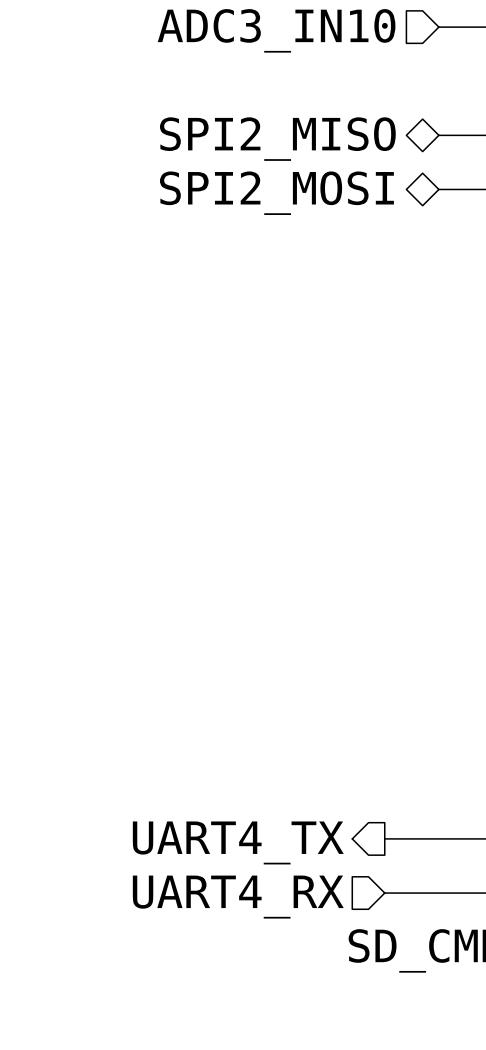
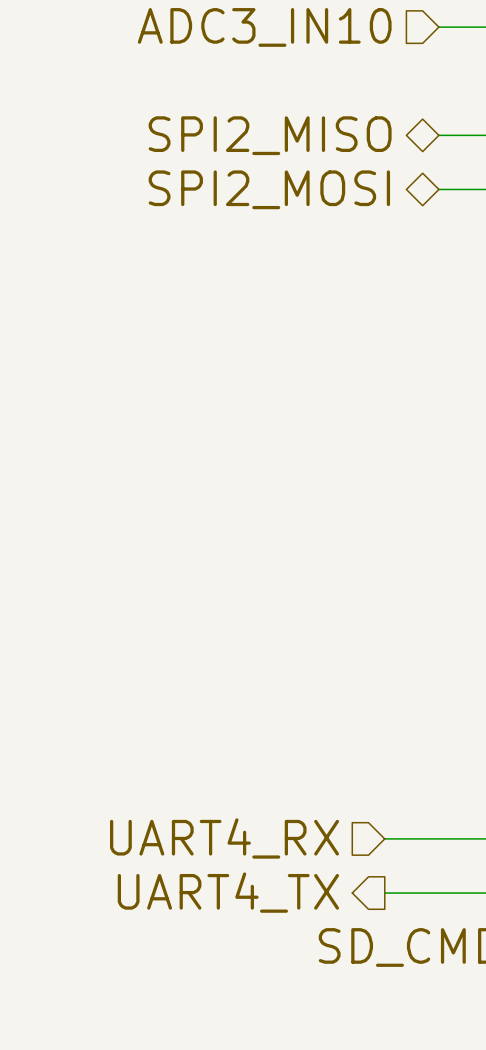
hierarchical label shape: output (238, 842) -> input (224, 838)
hierarchical label: UART4_TX (238, 842) -> UART4_RX (224, 838)
hierarchical label shape: input (238, 897) -> output (228, 892)
hierarchical label: UART4_RX (238, 897) -> UART4_TX (228, 892)

